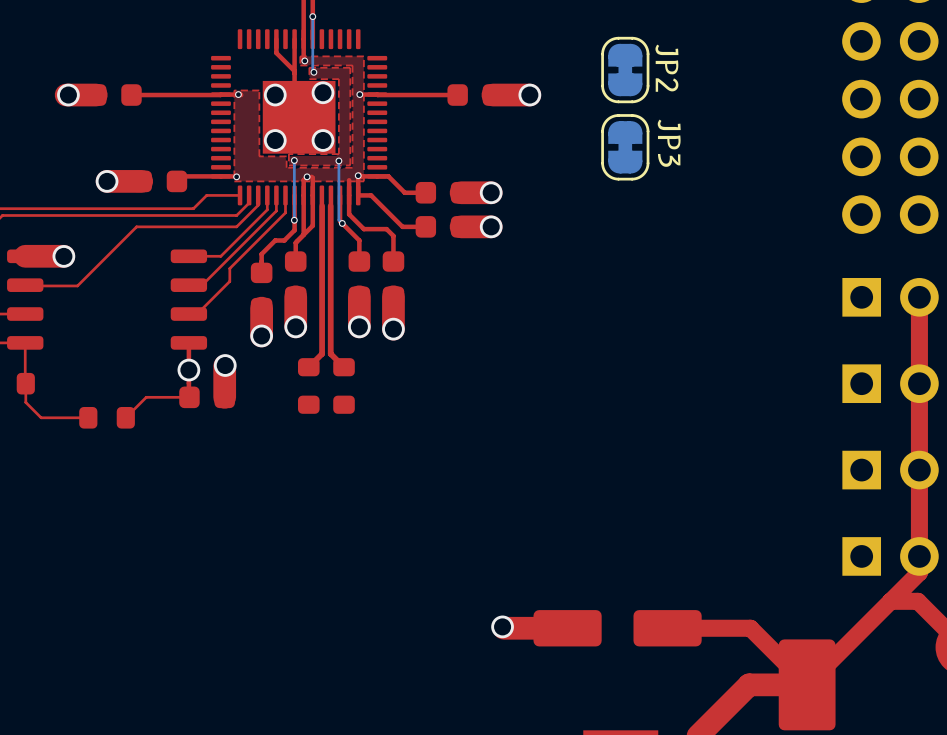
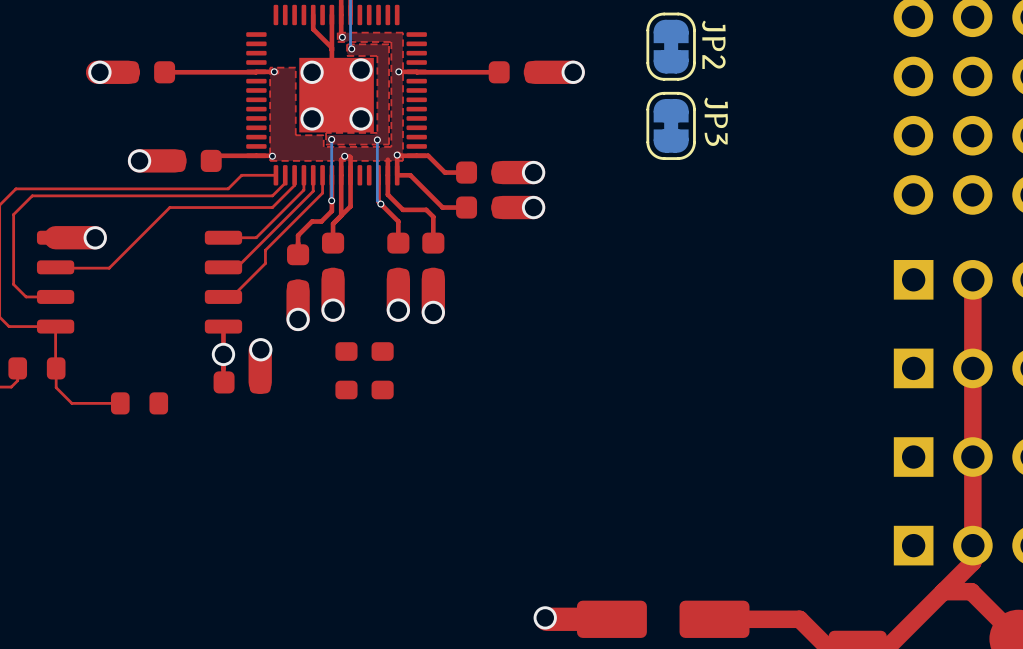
top track: (322, 205) (322, 353) (308, 367) -> none
top track: (330, 205) (330, 353) (344, 367) -> none
top track: (189, 397) (146, 397) (125, 417) -> none

